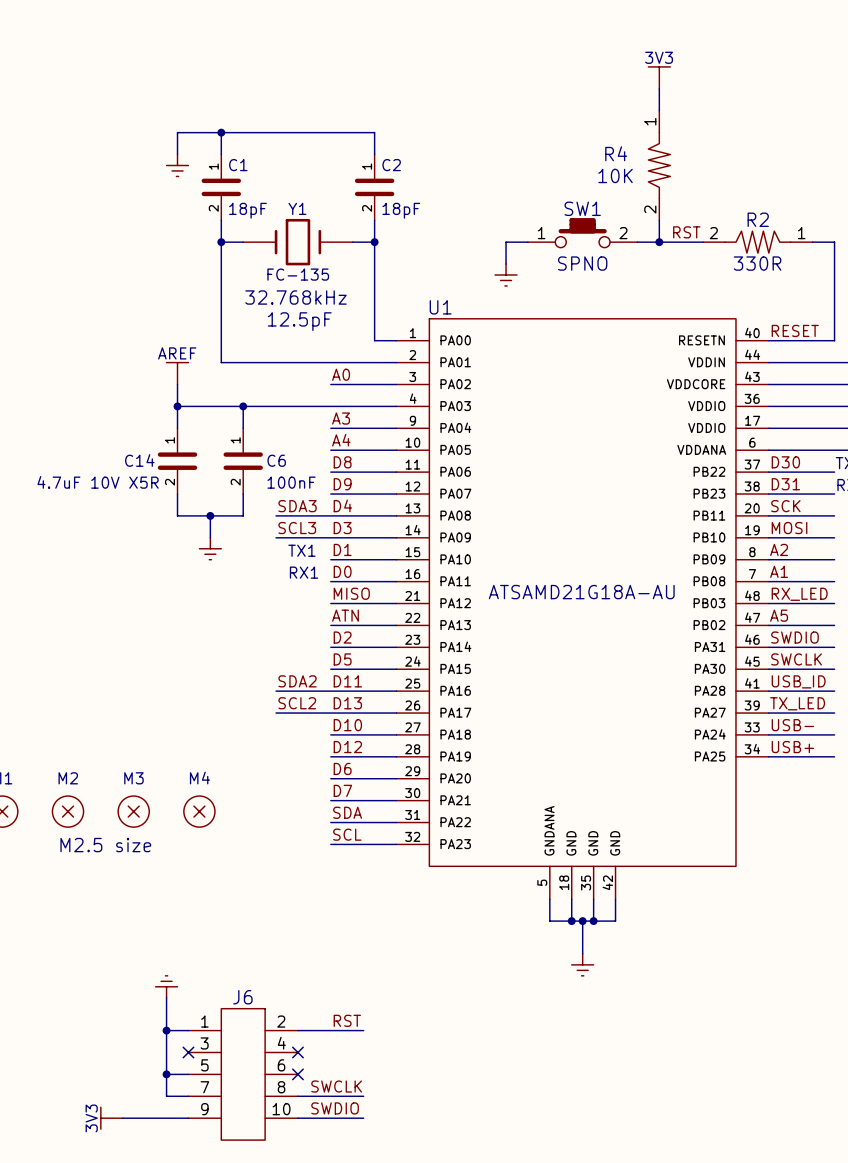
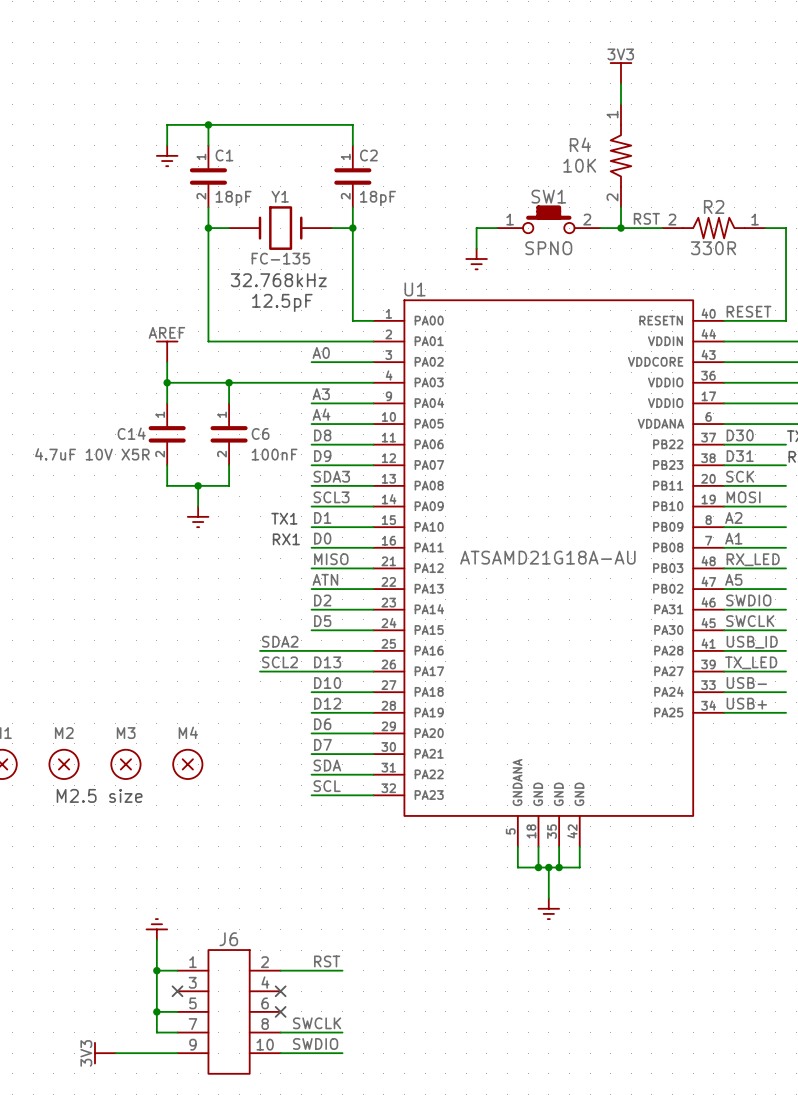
label: D4 (342, 505) -> SDA3 (331, 476)
label: SDA3 (297, 506) -> none
wire: (276, 515) (330, 515) -> none
label: SCL3 (297, 528) -> none
label: D3 (342, 528) -> SCL3 (331, 497)
wire: (276, 537) (330, 537) -> none
label: D11 (347, 681) -> none

